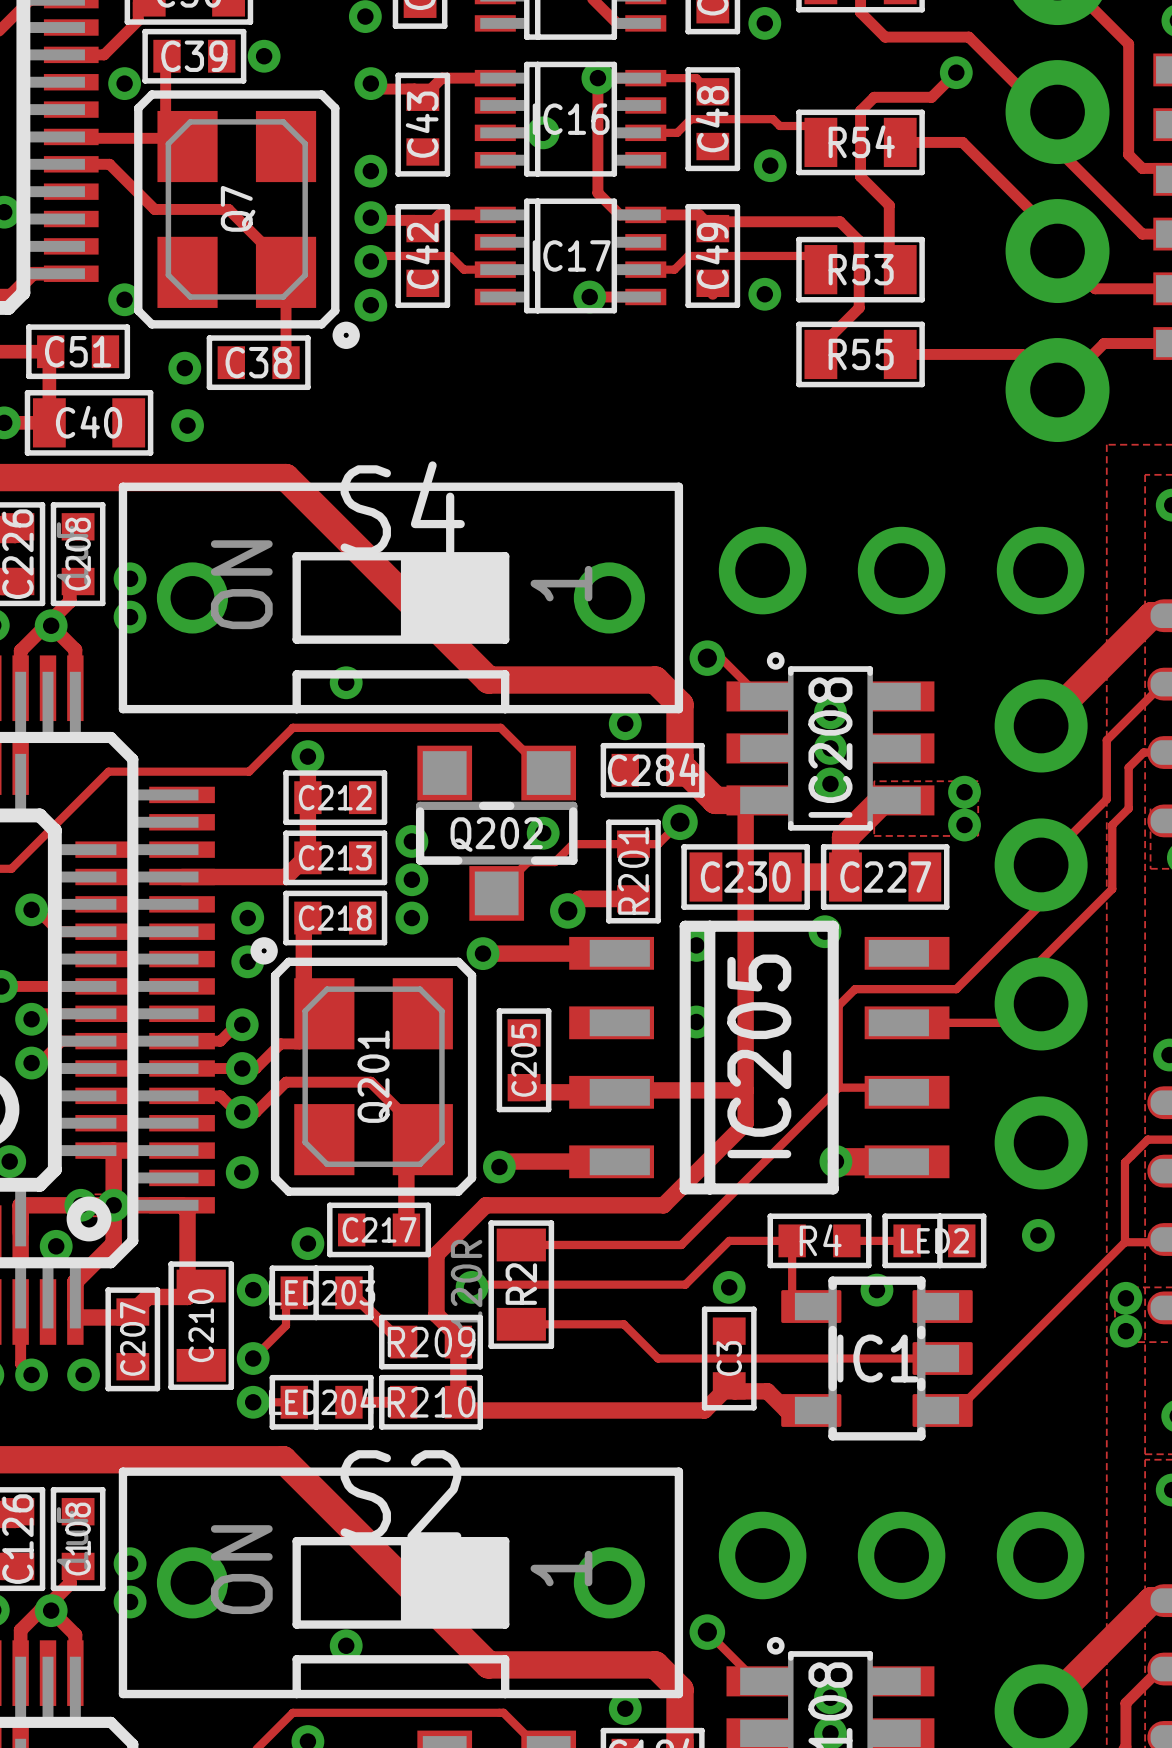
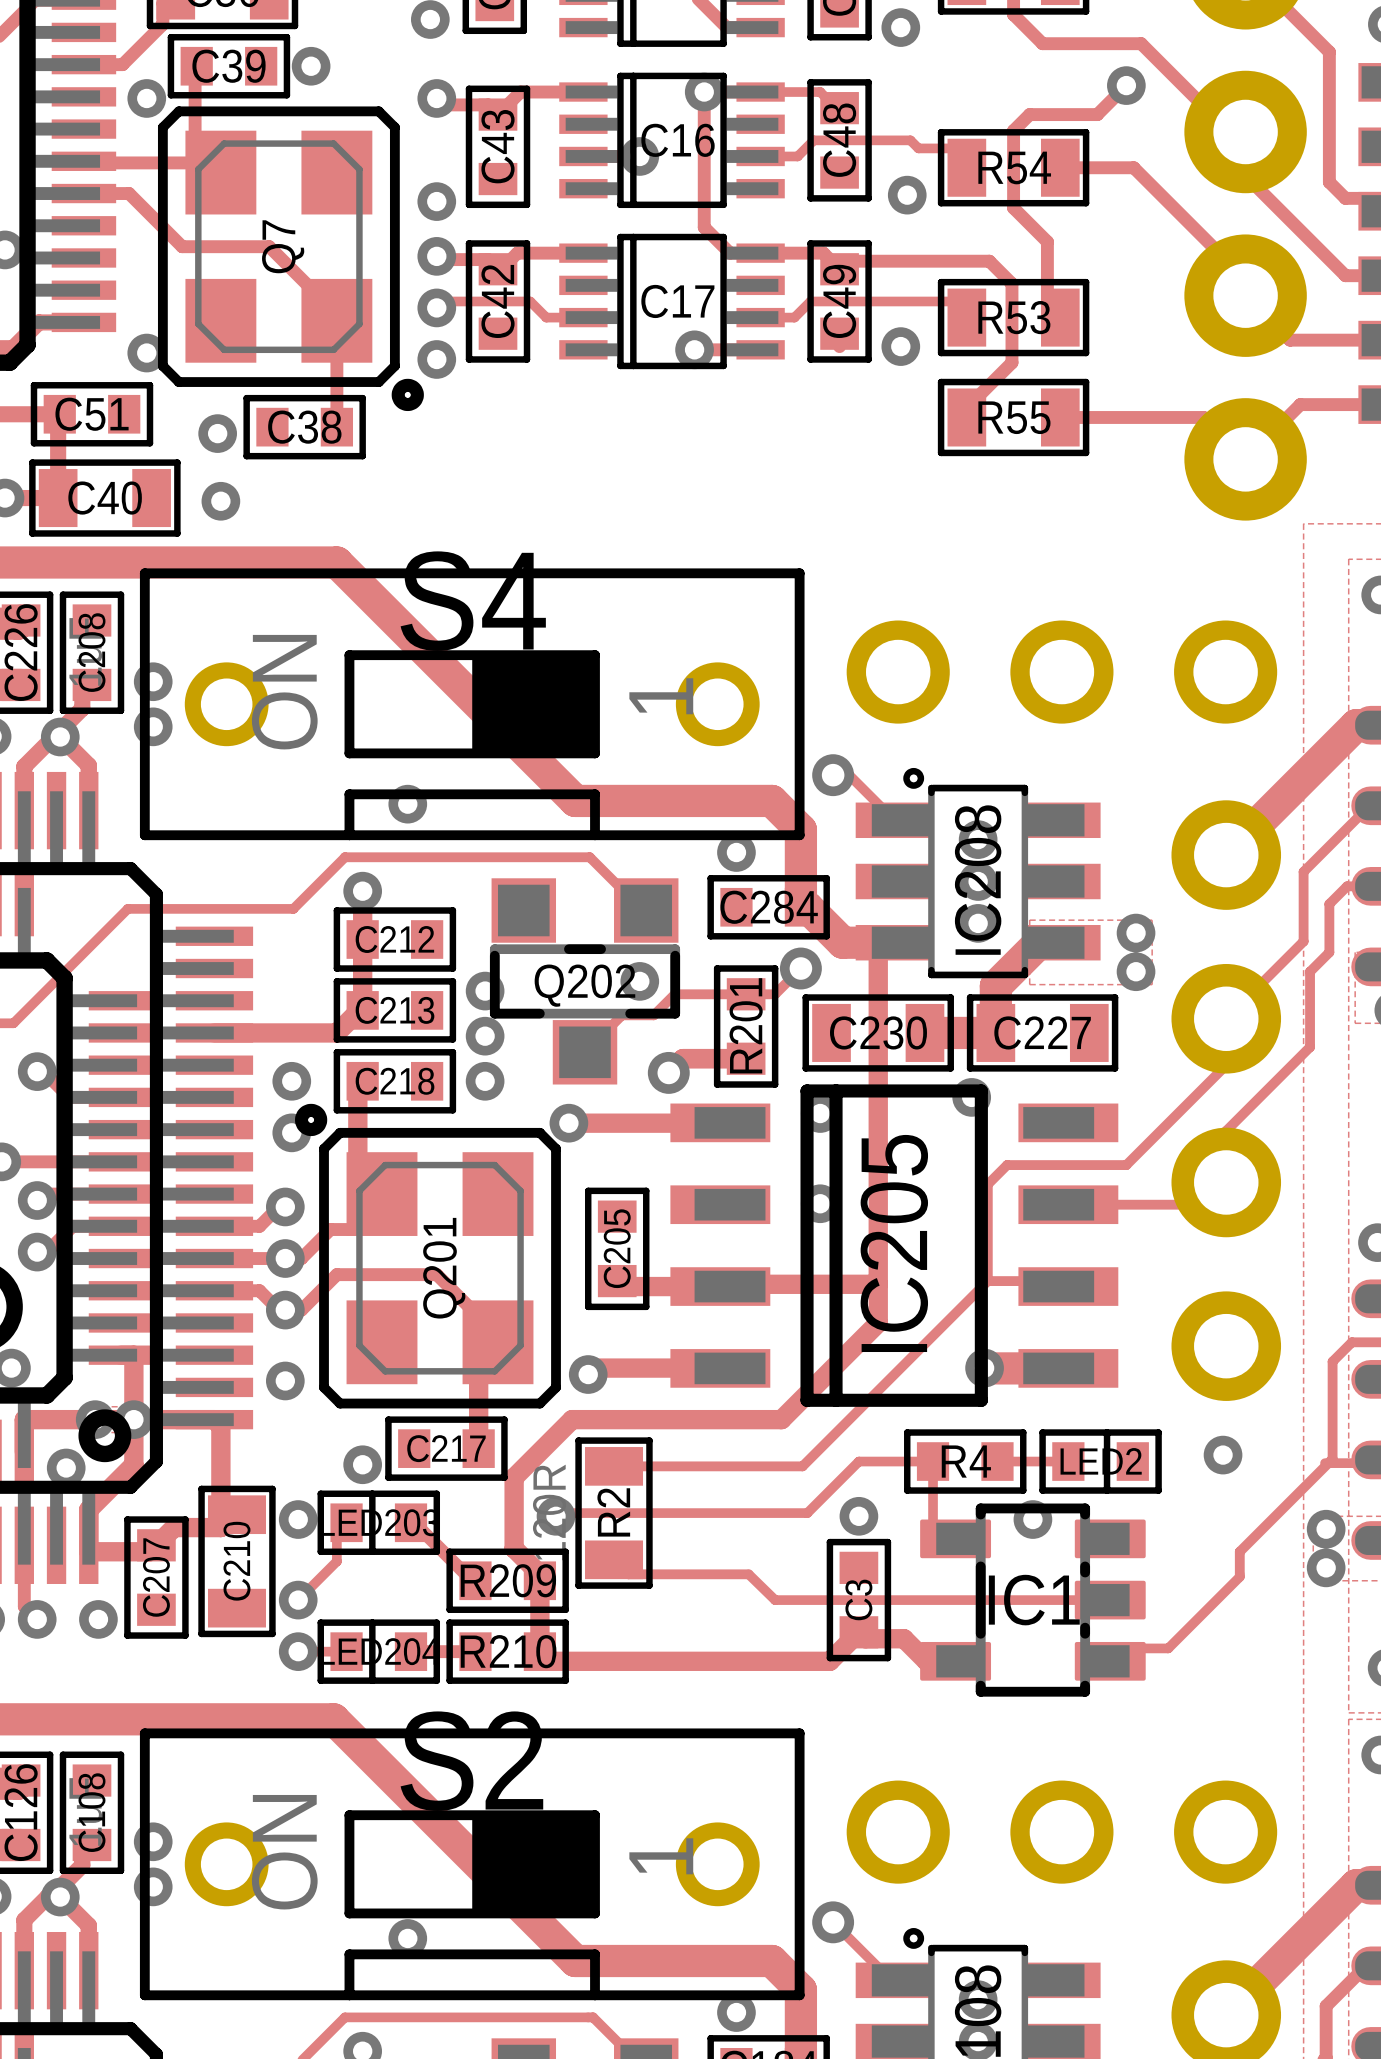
track: (1131, 1156) (1124, 1162) (1124, 1242) (968, 1398) (959, 1399) -> (1332, 1361) (1332, 1458) (1239, 1551) (1239, 1576) (1168, 1648) (1129, 1648)
track: (521, 1324) (623, 1324) (658, 1358) -> (614, 1559) (628, 1574) (748, 1574) (775, 1600)

